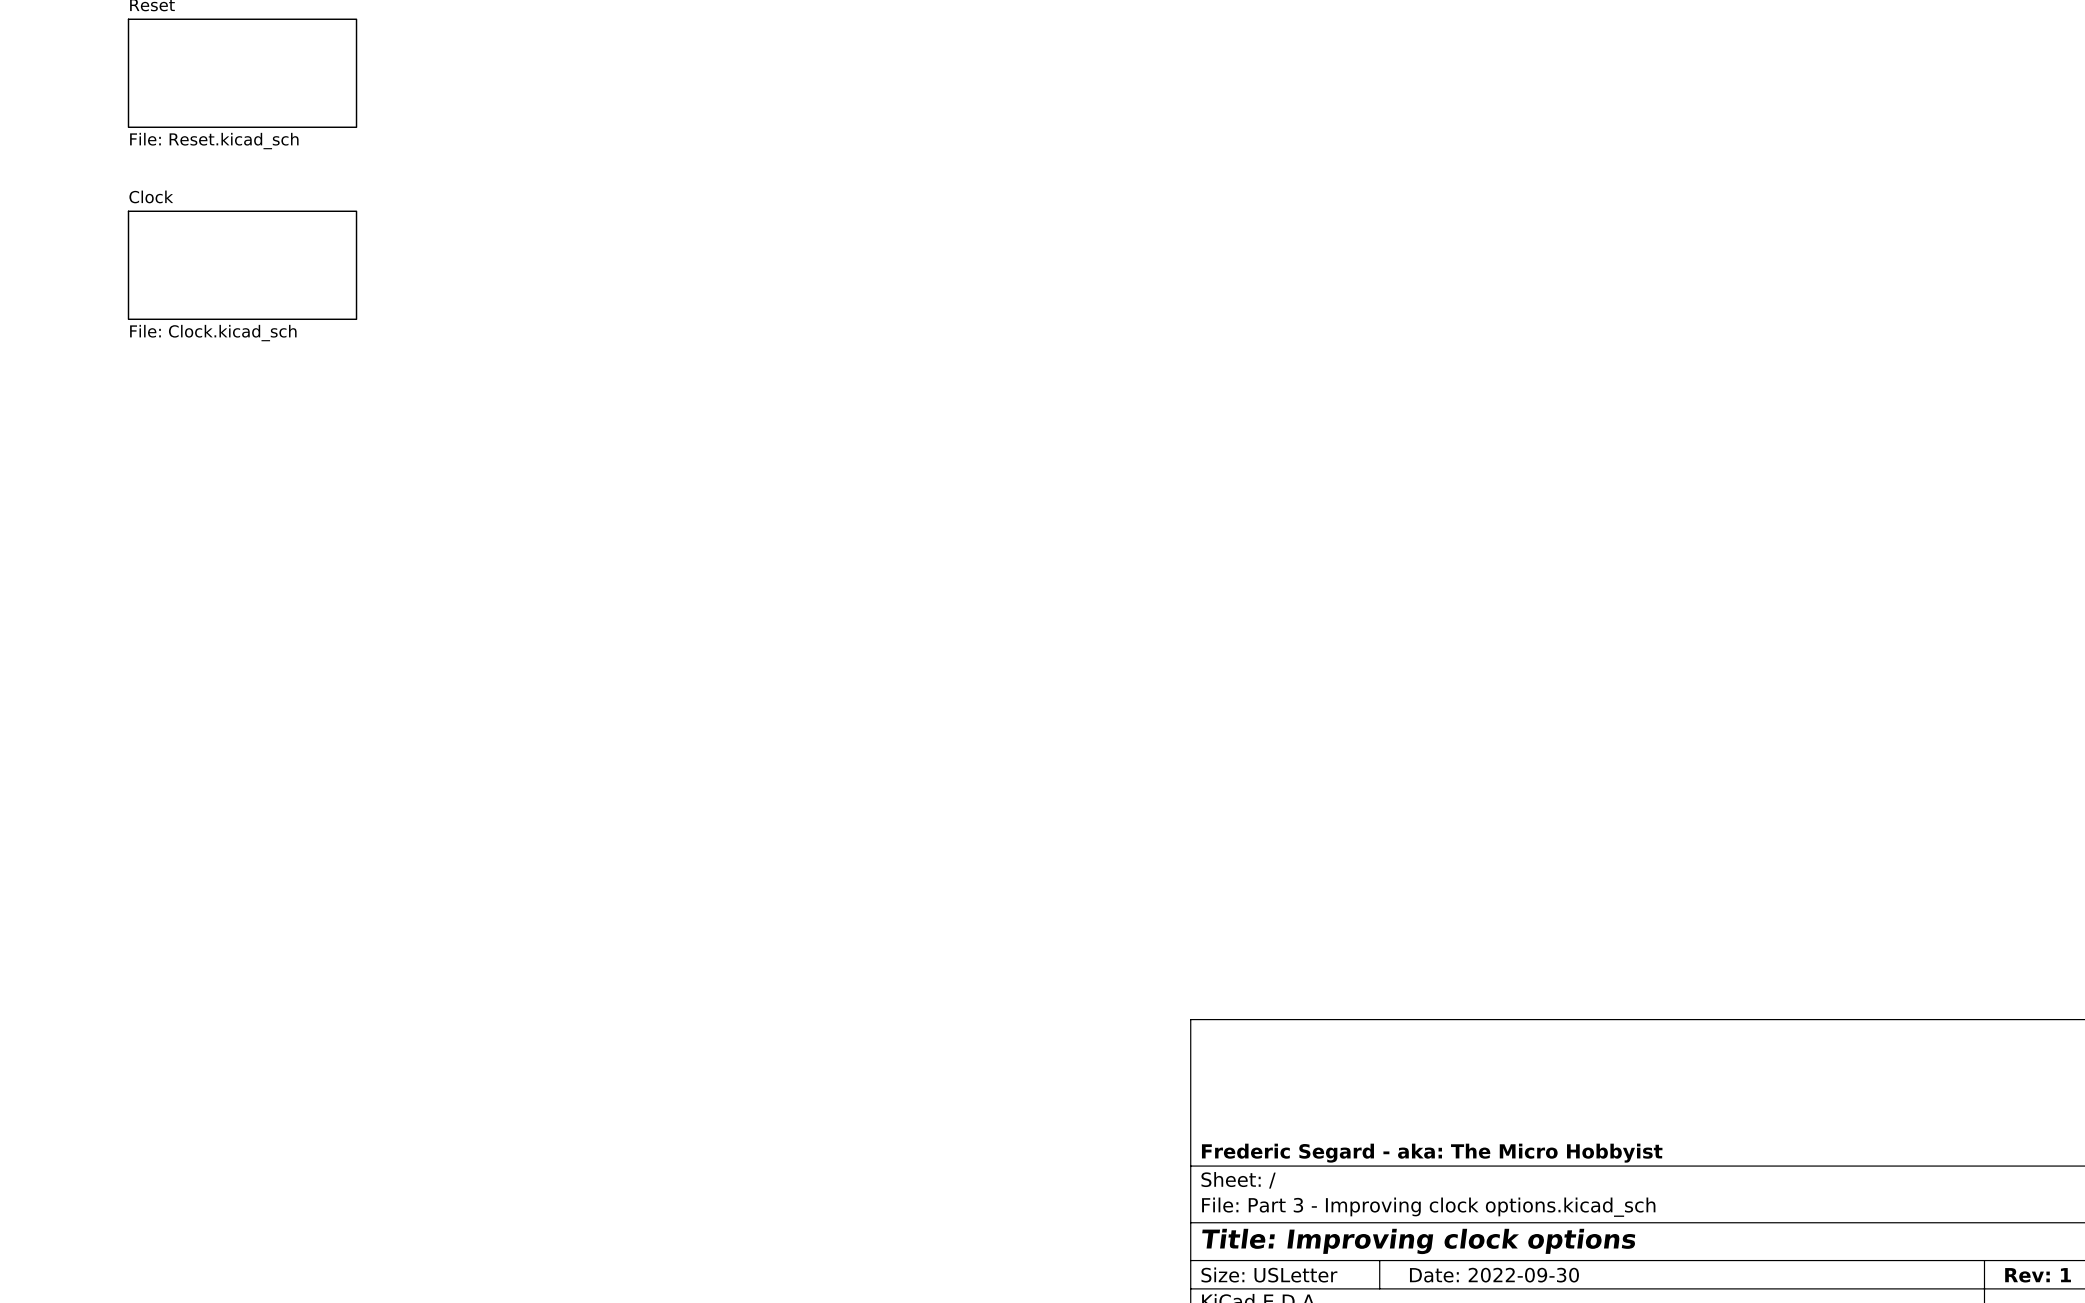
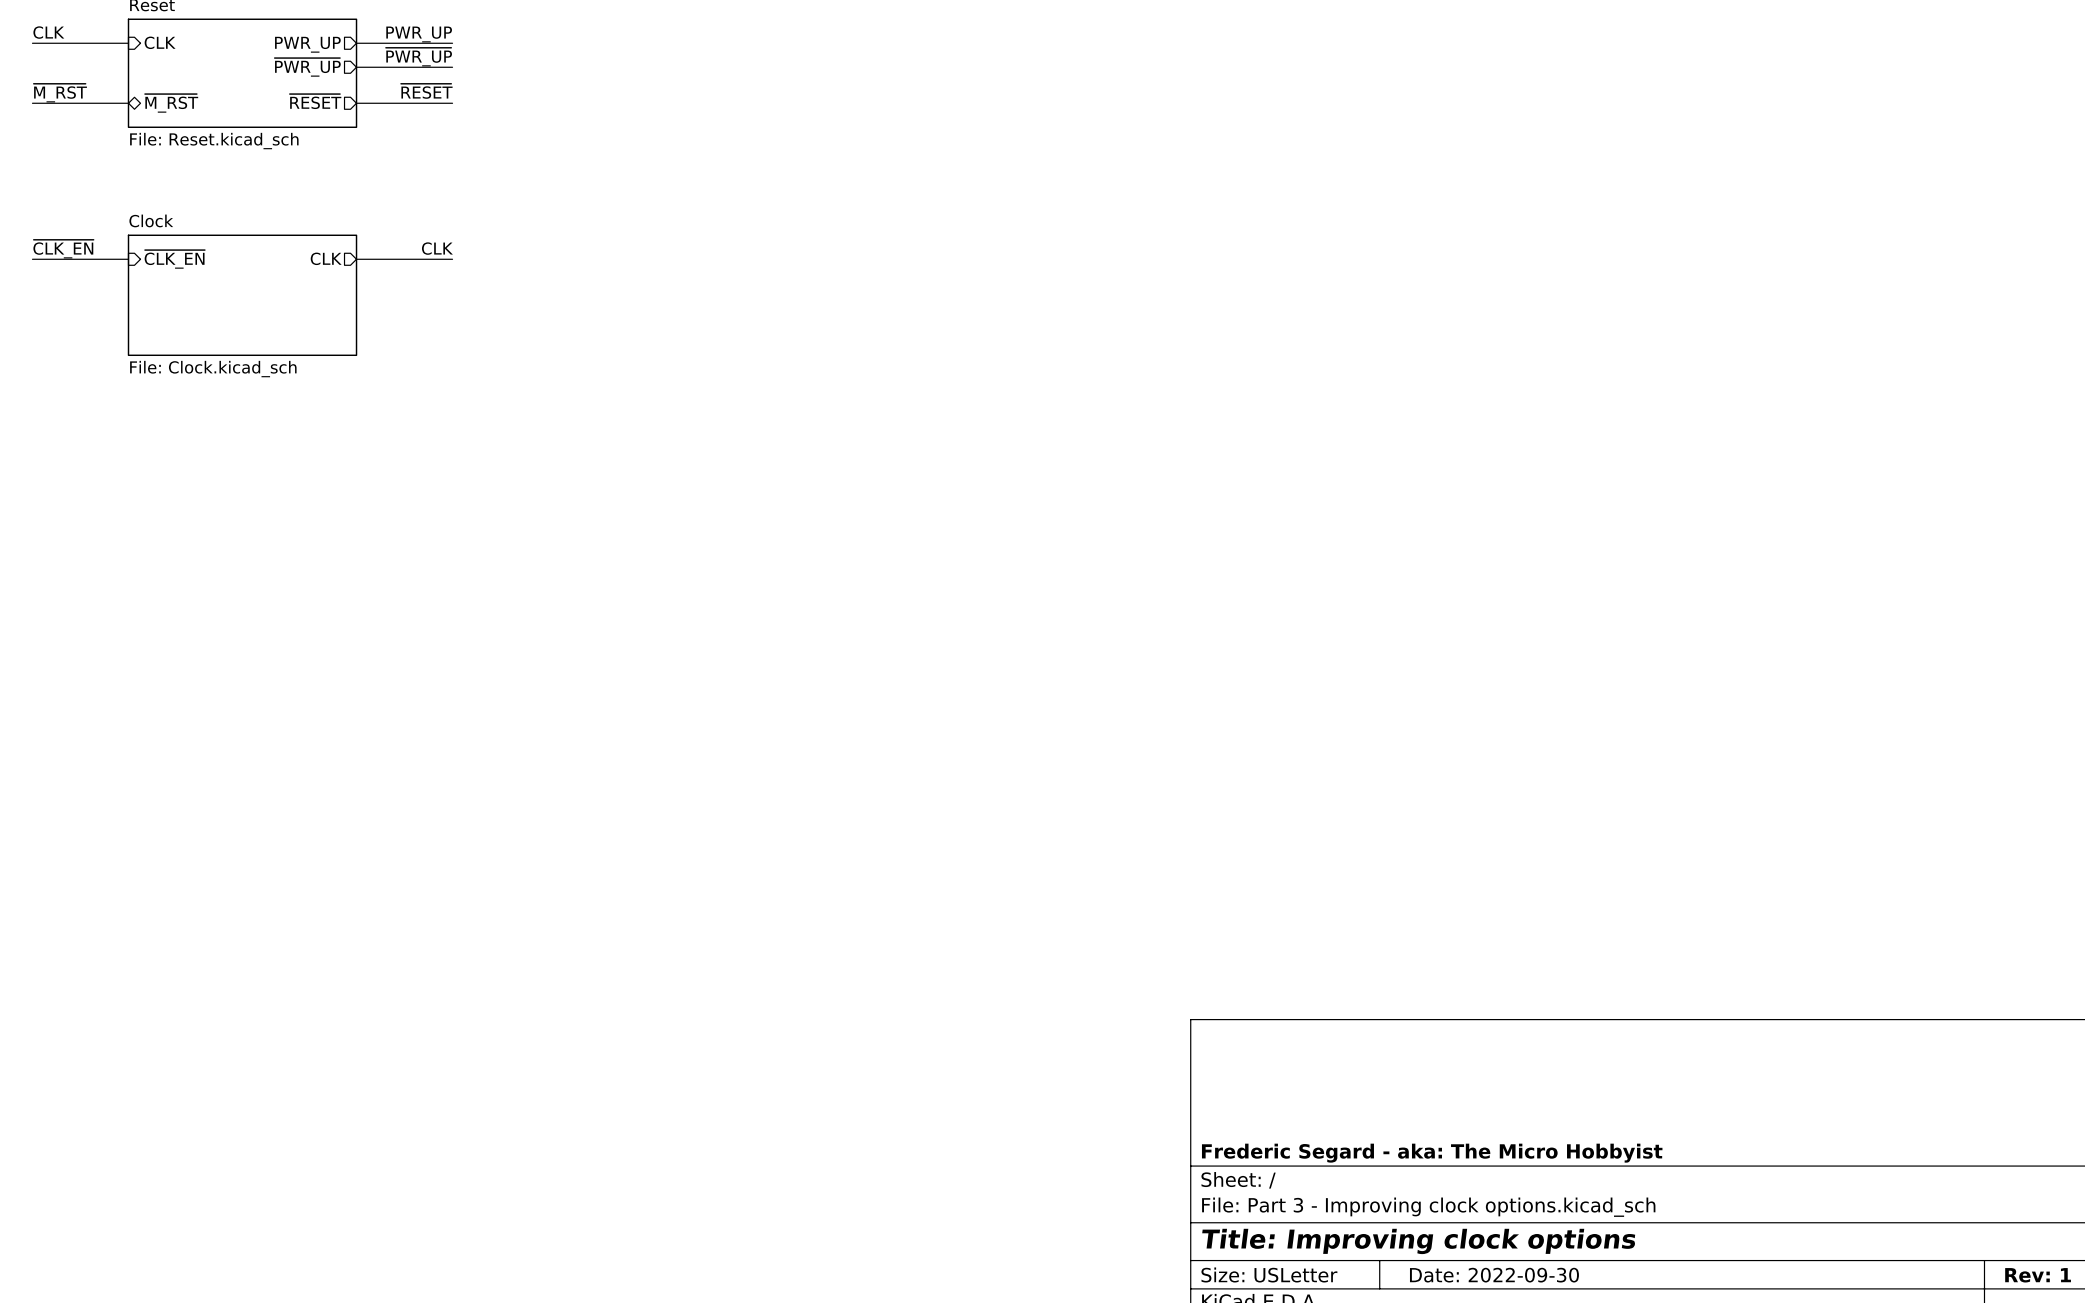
label: none -> CLK (48, 32)
label: none -> PWR_UP (419, 34)
sheet pin: none -> CLK (160, 42)
wire: none -> (32, 43) (128, 43)
wire: none -> (356, 43) (452, 43)
sheet pin: none -> PWR_UP (307, 44)
label: none -> ~{PWR_UP} (418, 57)
sheet pin: none -> ~{PWR_UP} (307, 67)
wire: none -> (356, 67) (452, 67)
label: none -> ~{RESET} (426, 91)
label: none -> ~{M_RST} (60, 93)
sheet pin: none -> ~{RESET} (315, 101)
wire: none -> (32, 103) (128, 103)
sheet pin: none -> ~{M_RST} (171, 103)
wire: none -> (356, 103) (452, 103)
label: none -> CLK (437, 248)
label: none -> ~{CLK_EN} (63, 249)
sheet pin: none -> CLK (326, 258)
wire: none -> (32, 259) (128, 259)
sheet pin: none -> ~{CLK_EN} (174, 259)
wire: none -> (356, 259) (452, 259)
sheet Clock: File: Clock.kicad_sch (242, 265) -> none
sheet Clock: none -> File: Clock.kicad_sch (242, 295)

